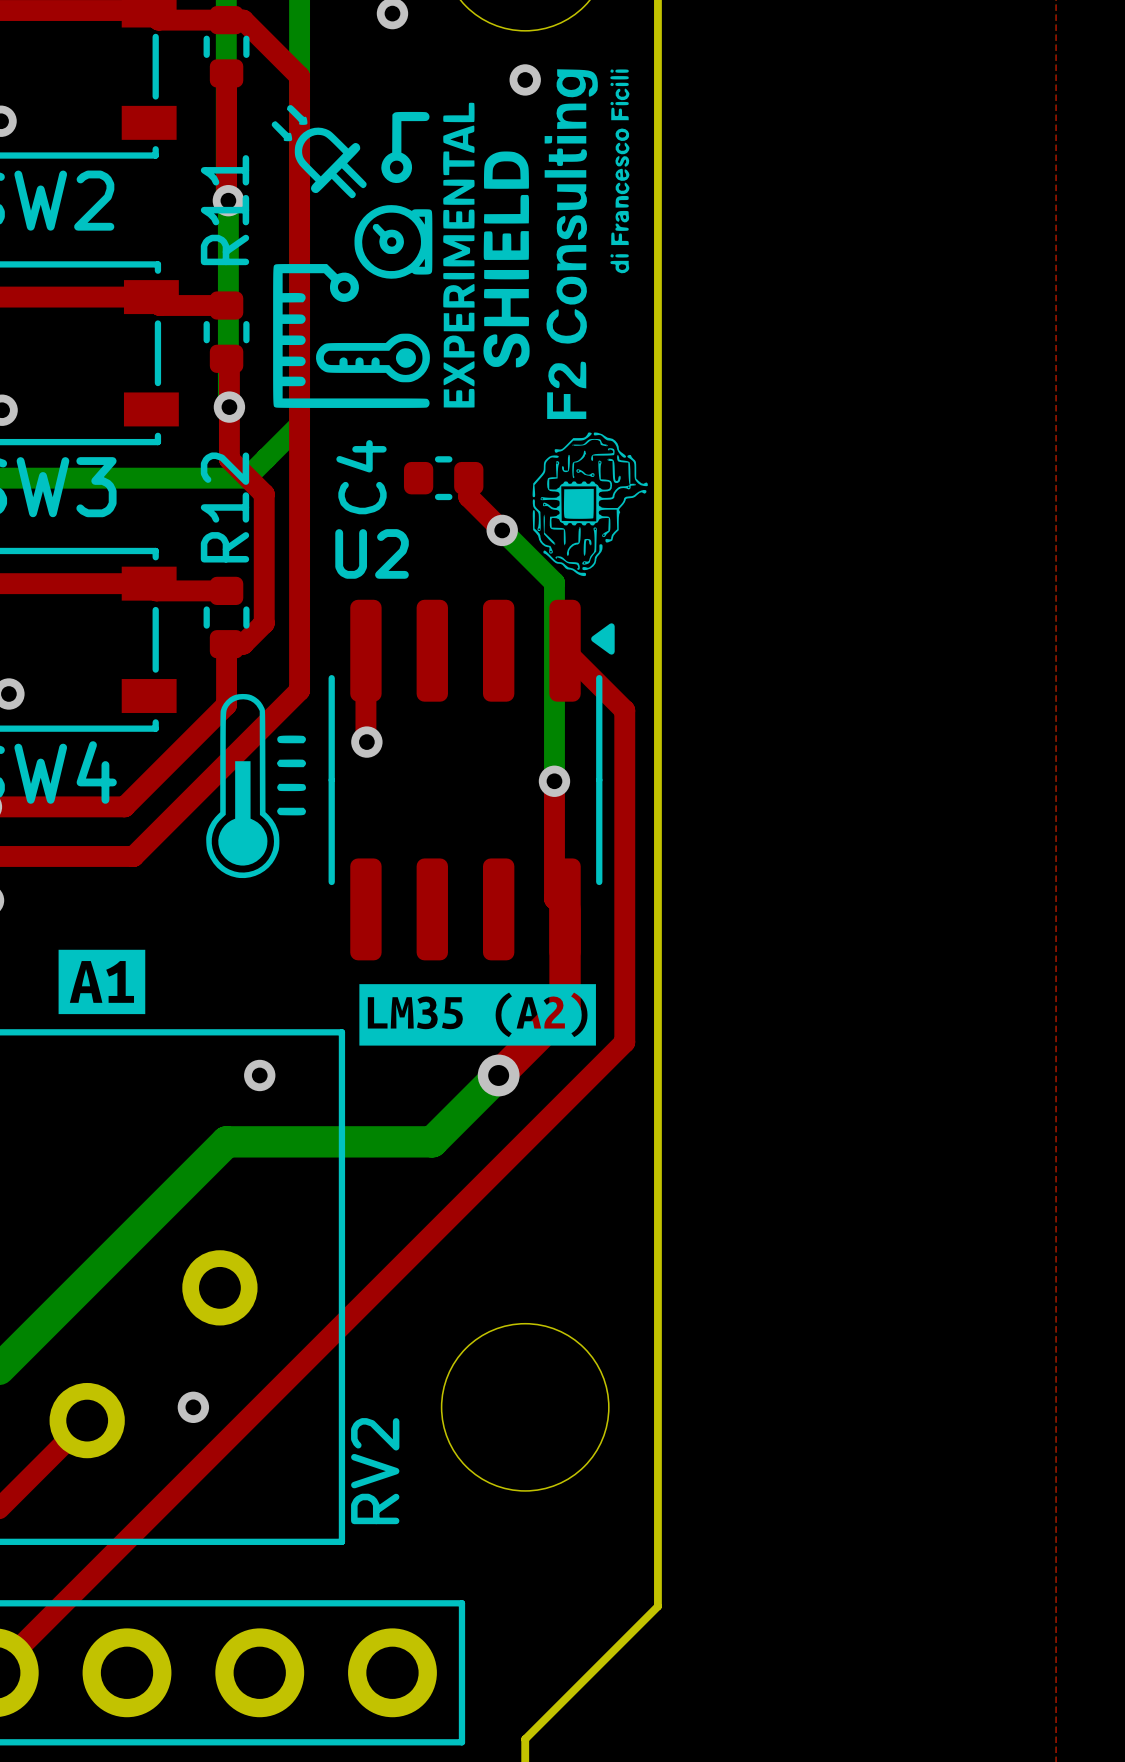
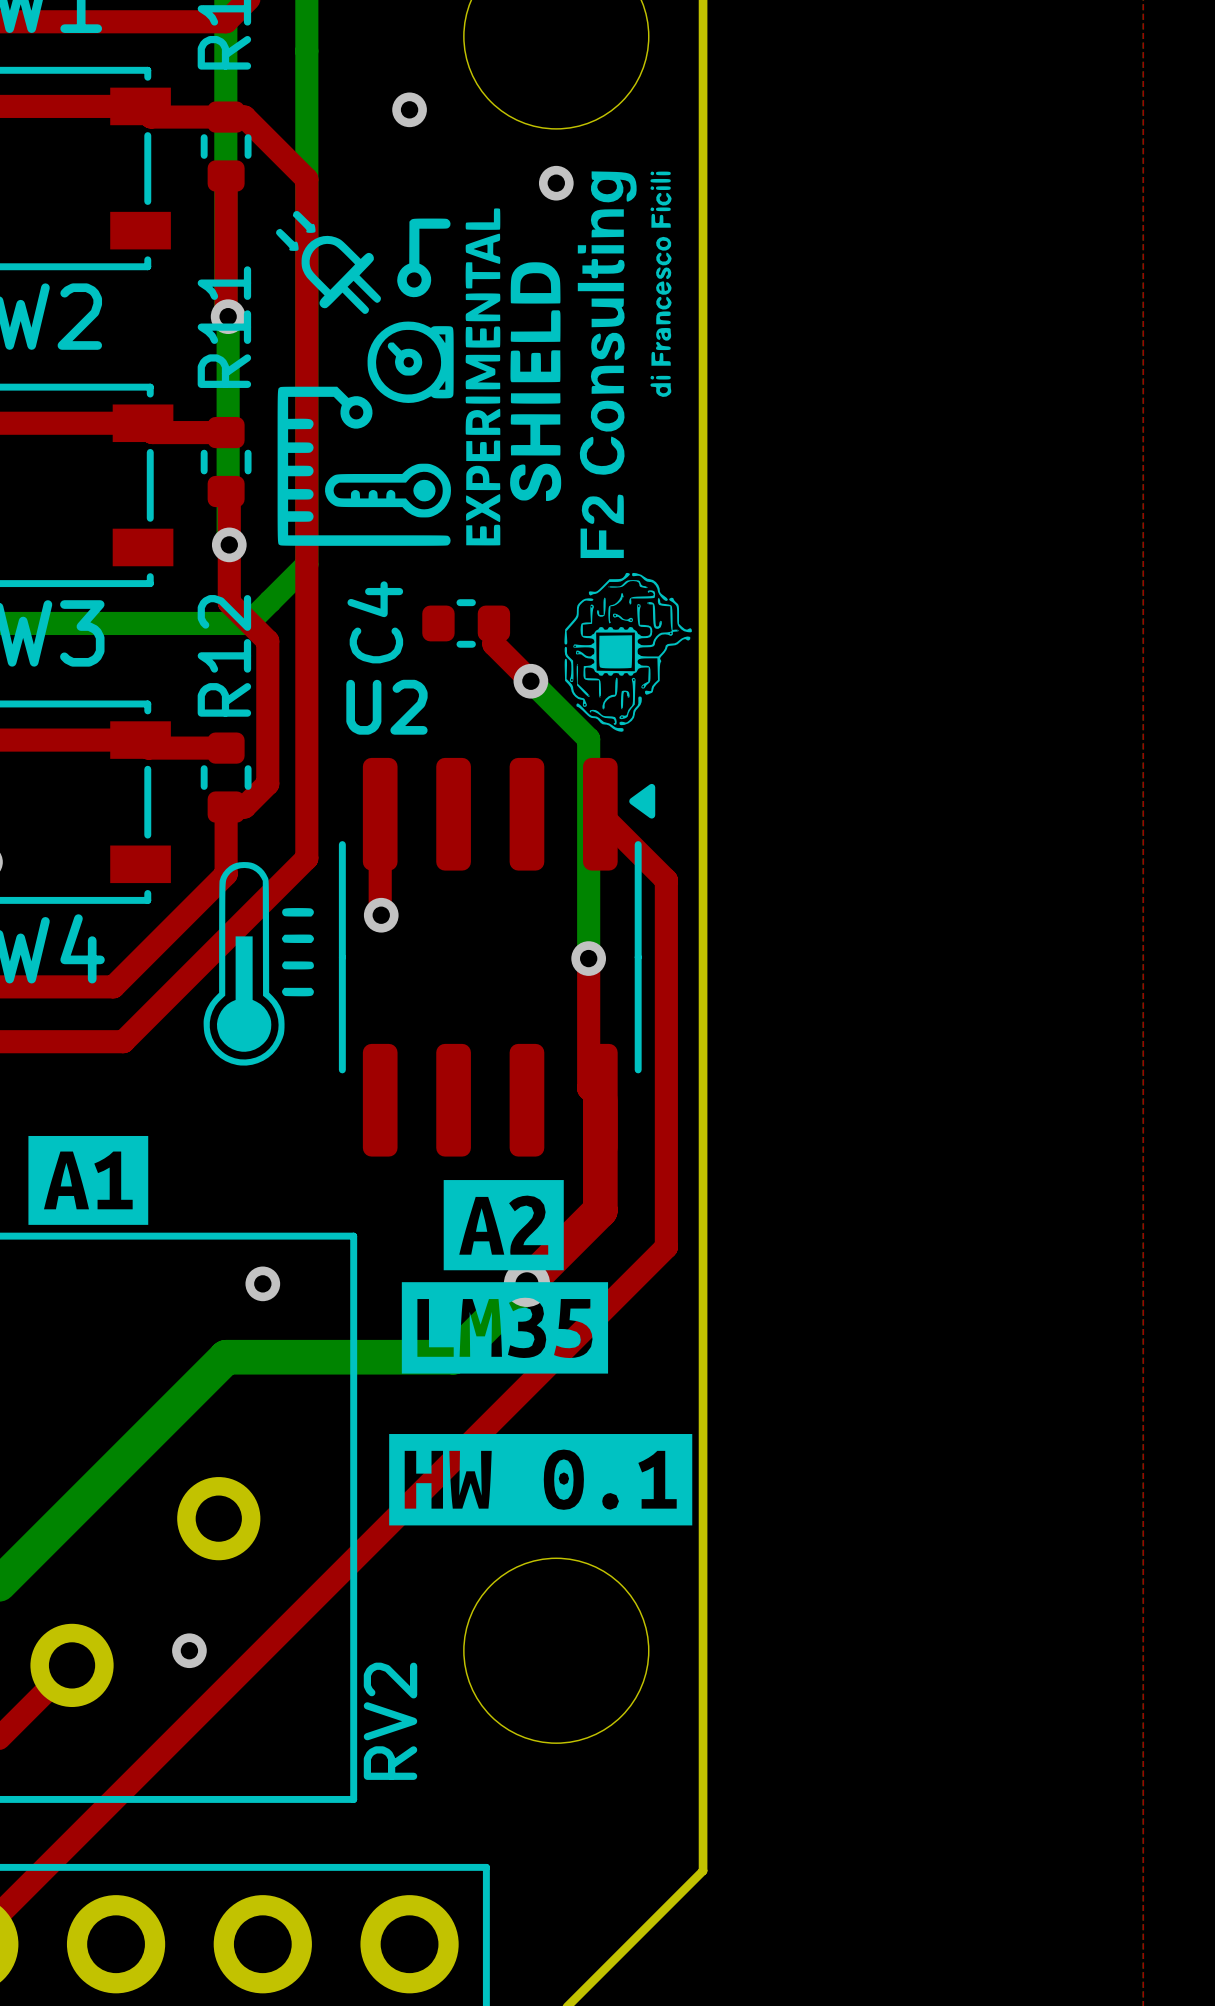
drawing shape: [58, 949, 146, 1015] -> [28, 1135, 149, 1225]
drawing shape: [359, 984, 596, 1046] -> [443, 1180, 564, 1271]
drawing: none -> [389, 1282, 693, 1526]

